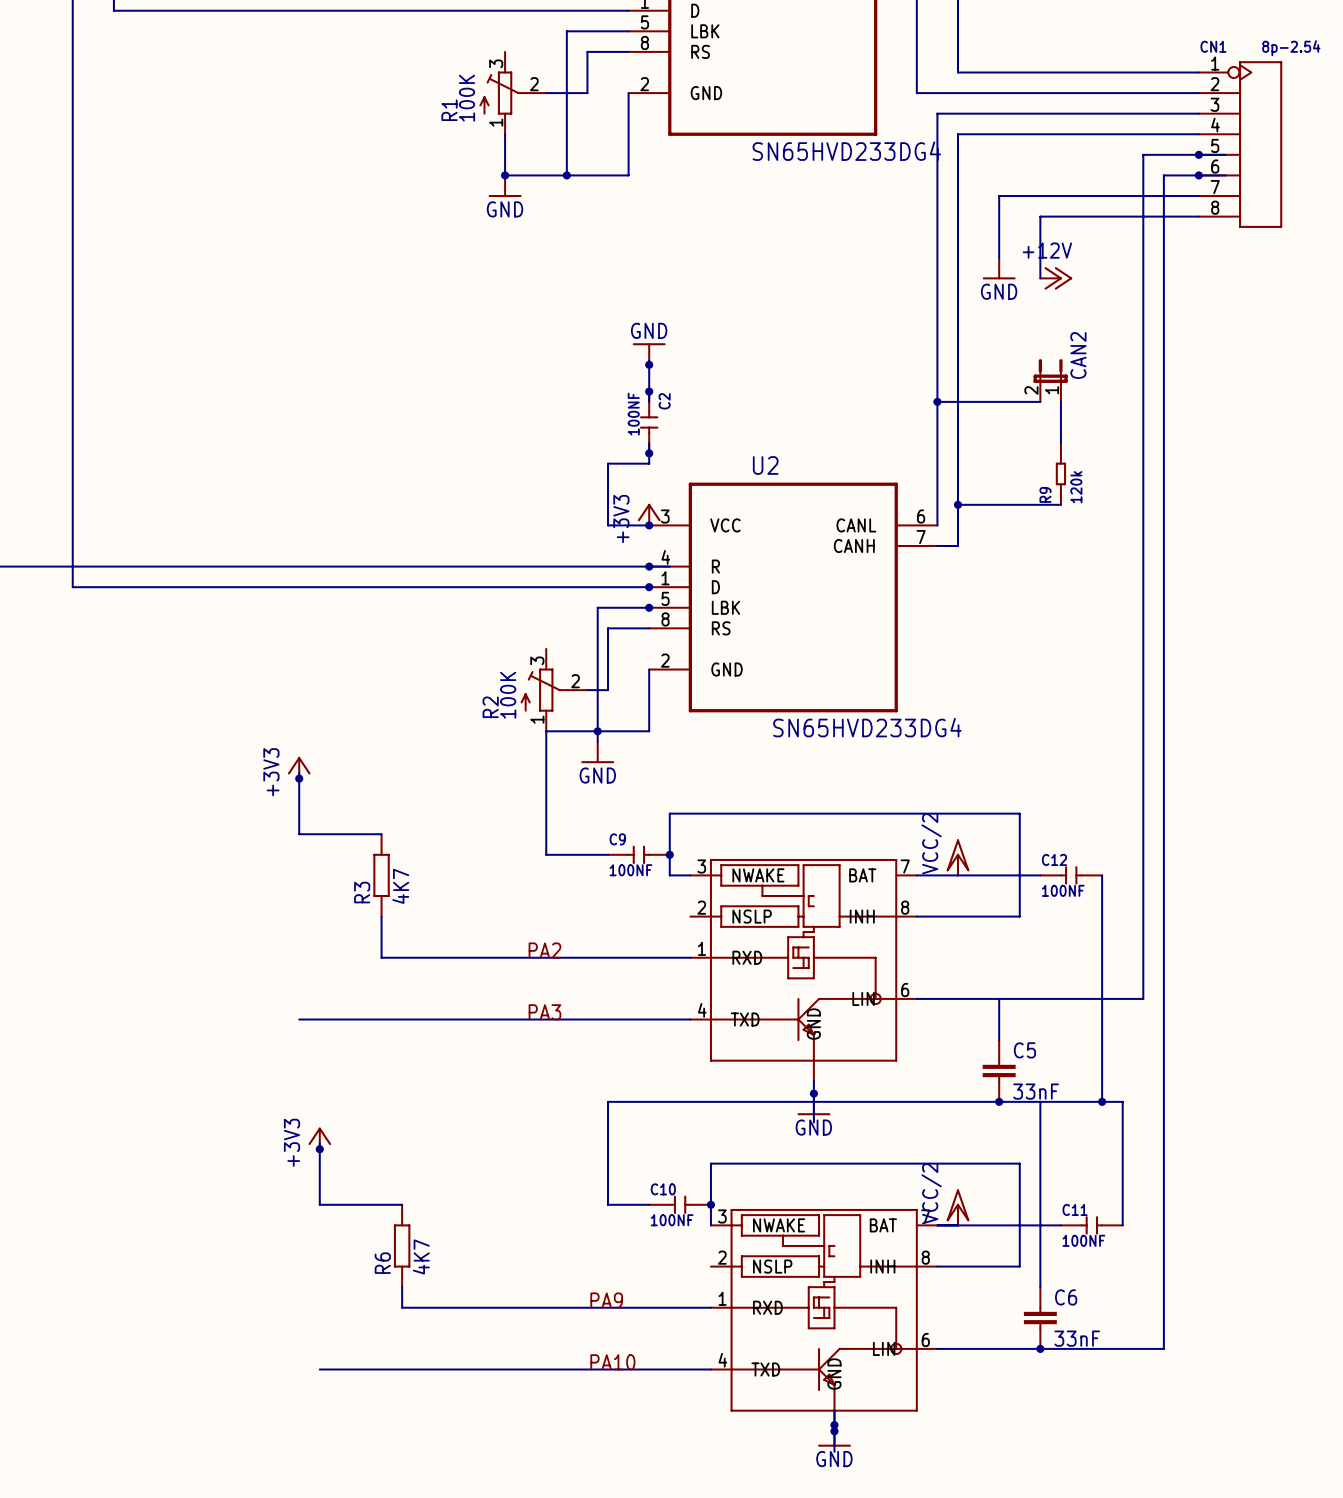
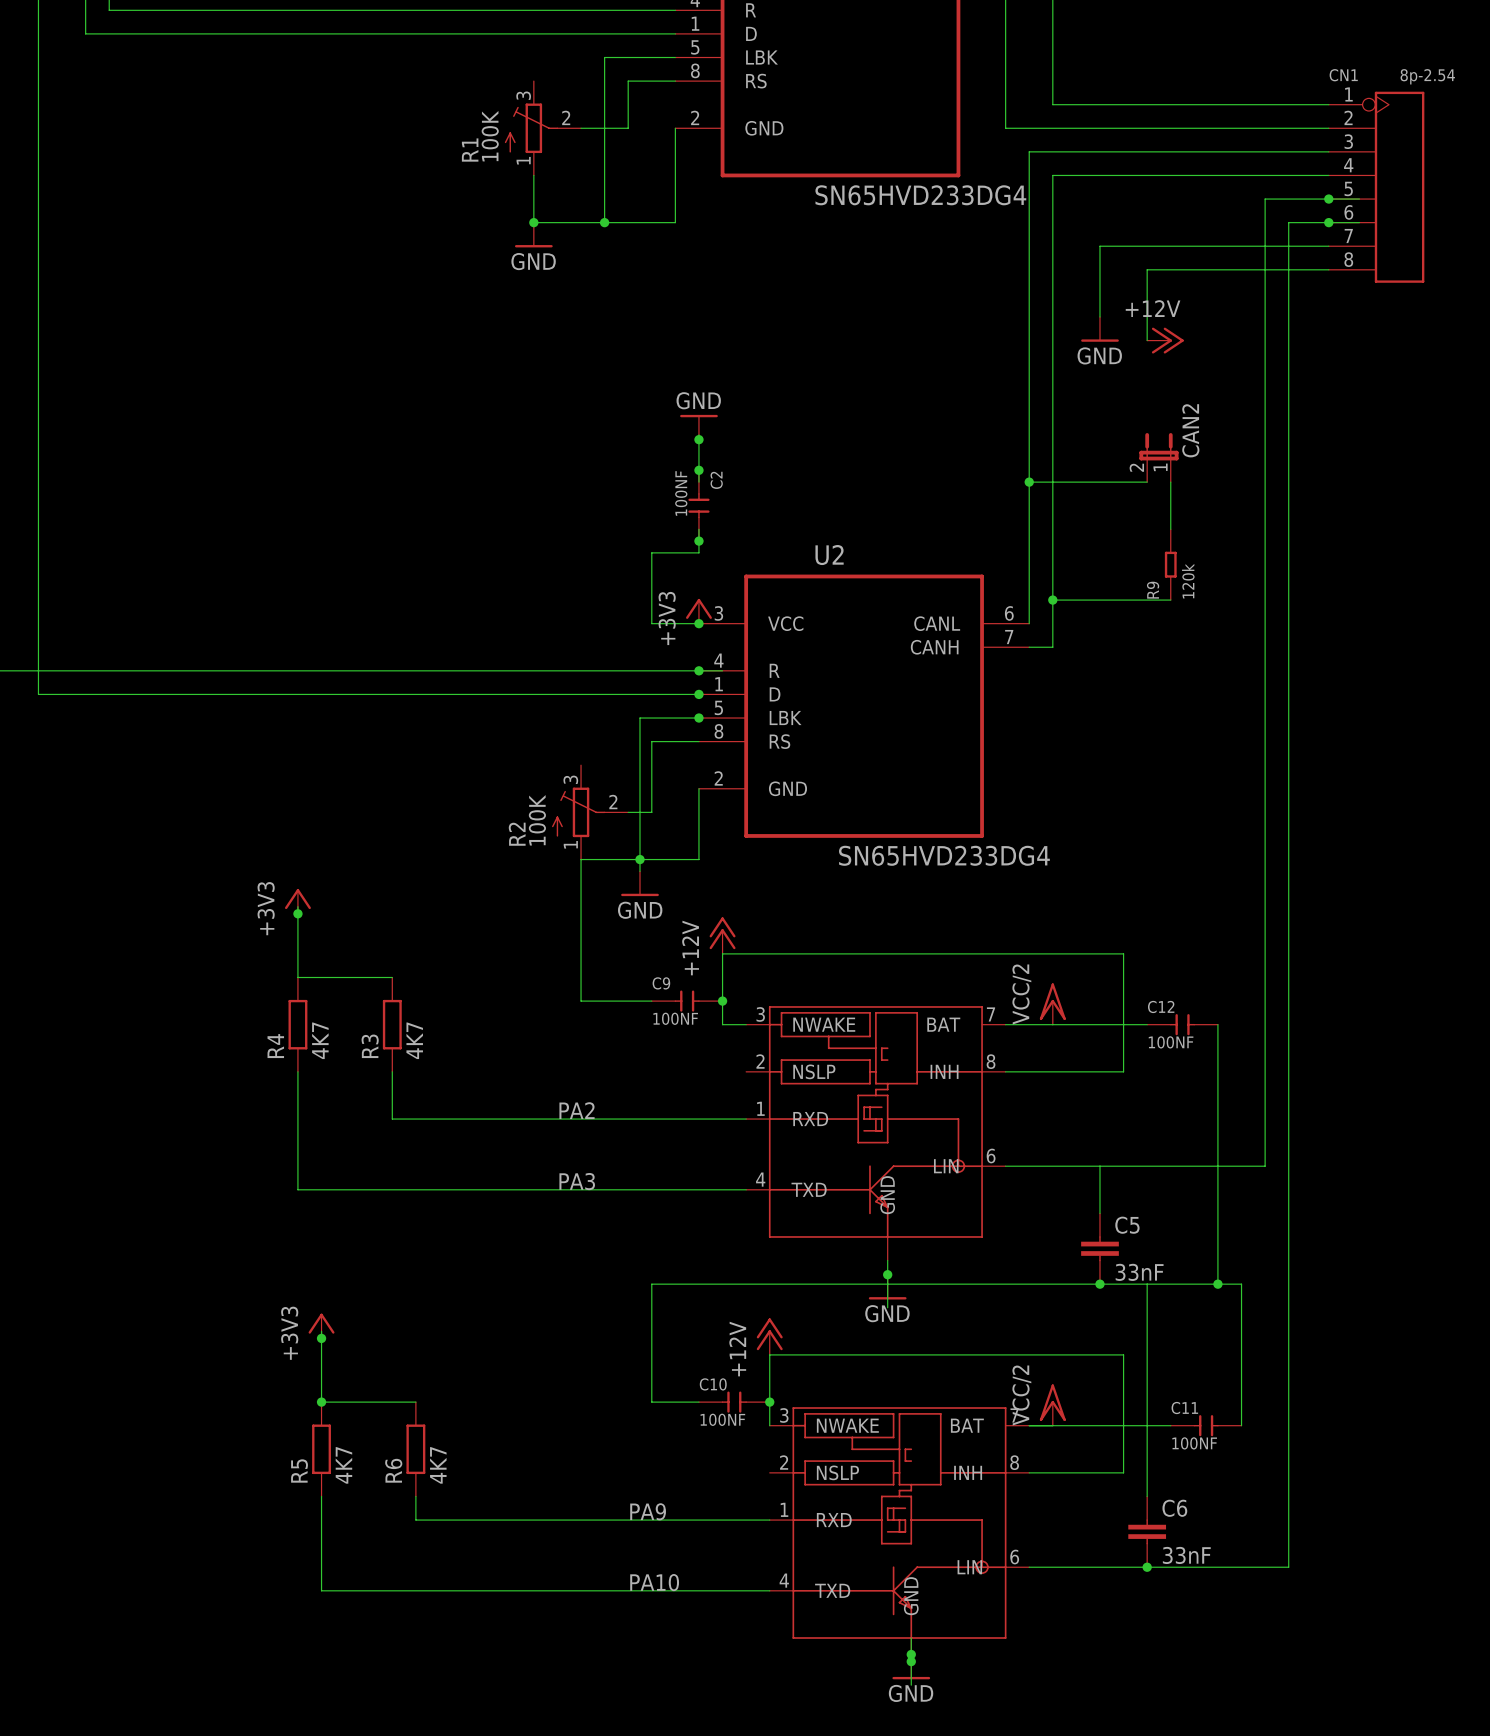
power symbol: none -> +12V (722, 935)
R4: none -> 4K7 (297, 1024)
wire: none -> (297, 1071) (297, 1189)
power symbol: none -> +12V (769, 1336)
junction: none -> (321, 1402)
R5: none -> 4K7 (321, 1449)
wire: none -> (321, 1496) (321, 1590)

